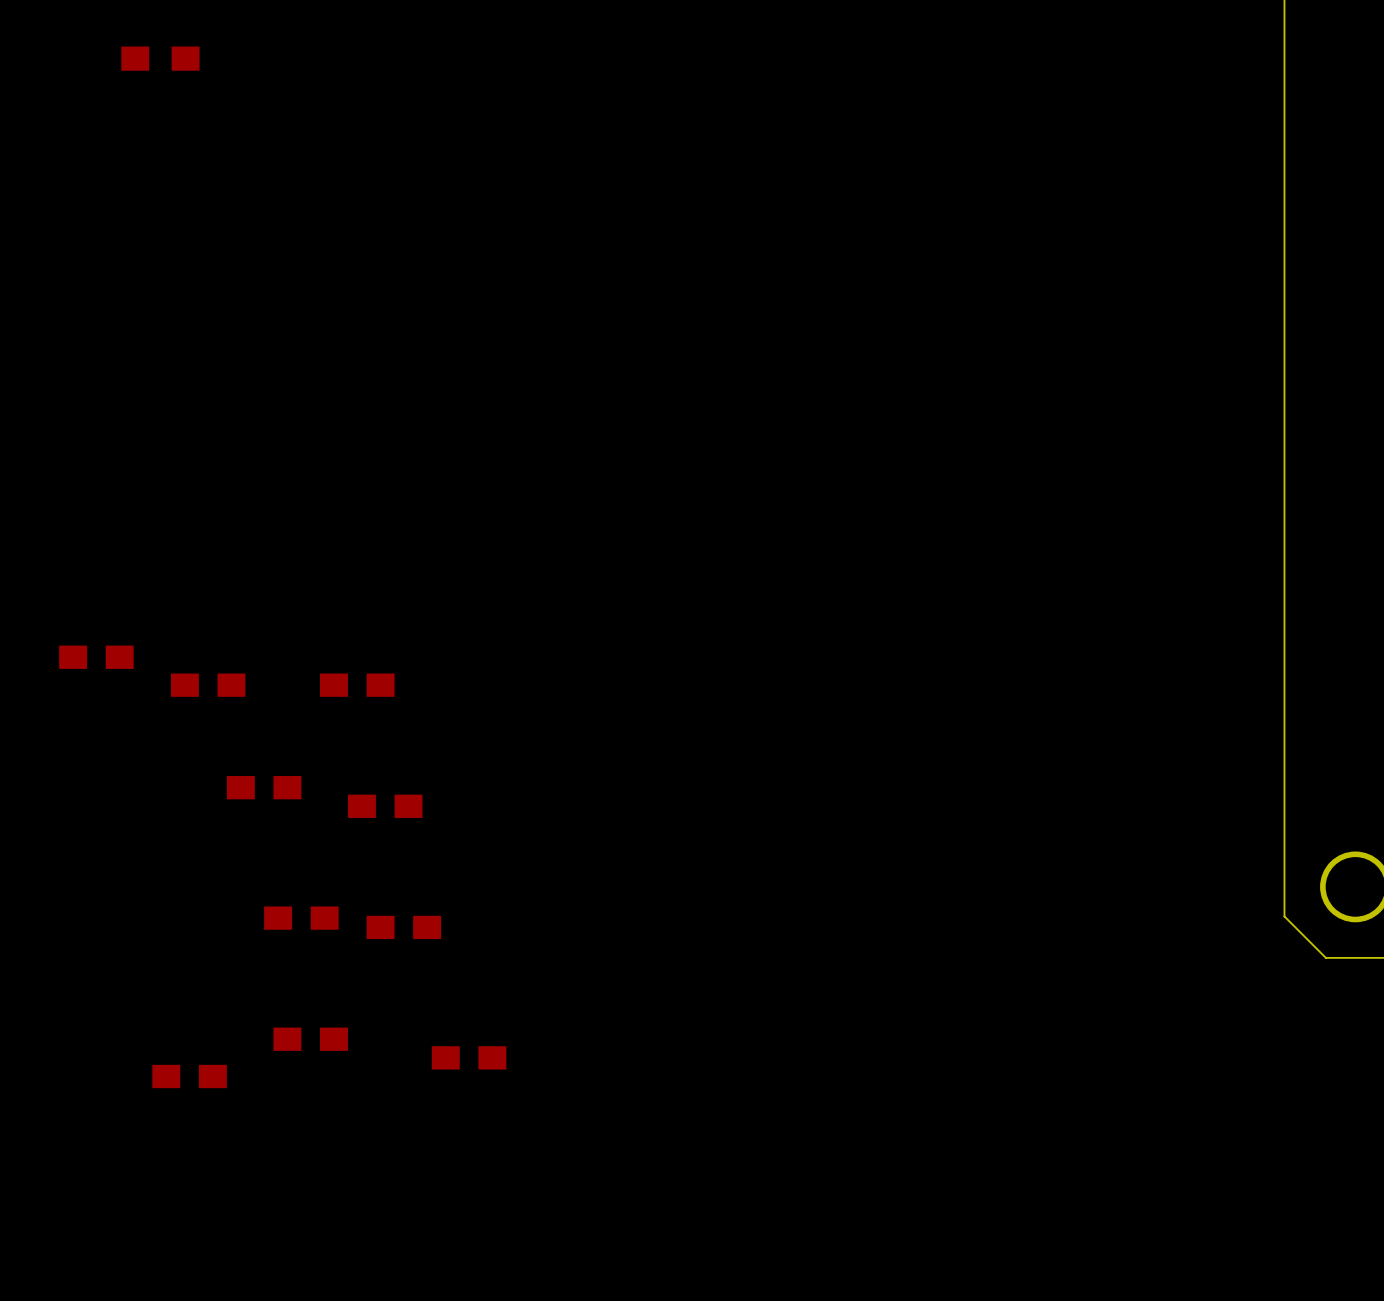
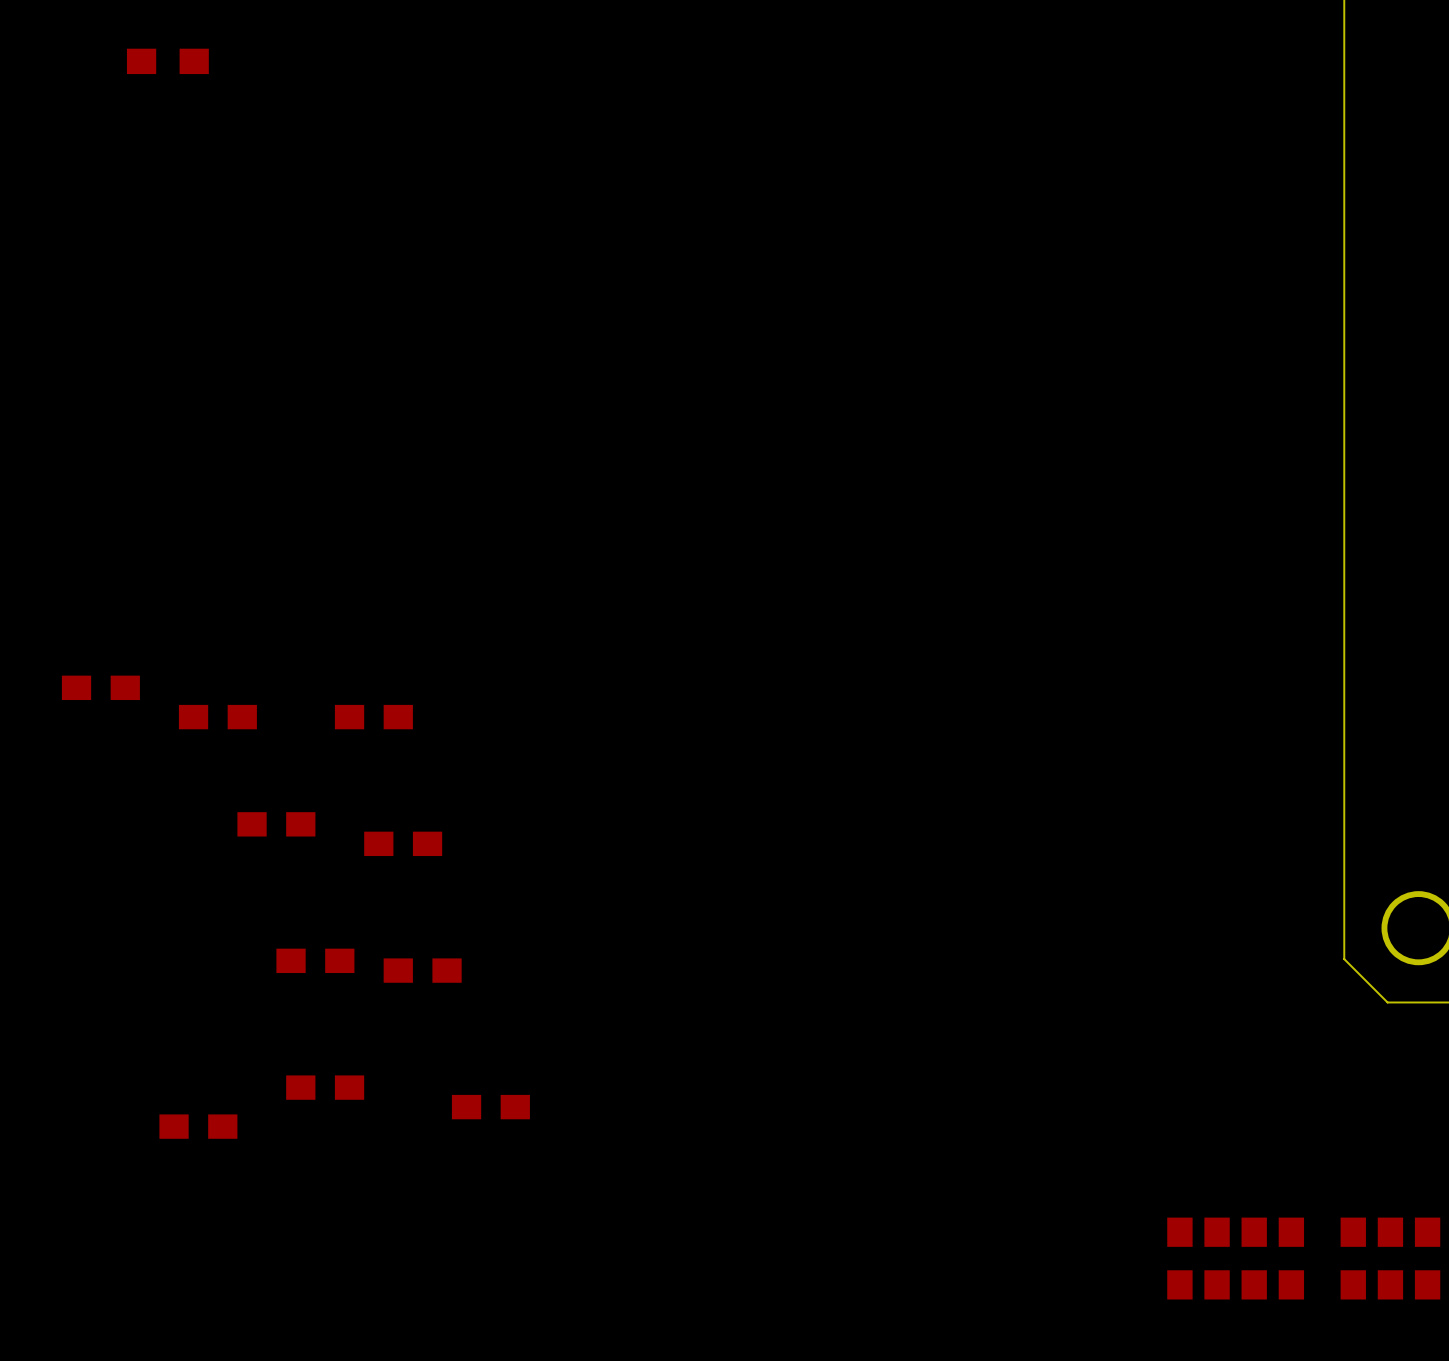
part: none -> (1179, 1258)
part: none -> (1217, 1258)
part: none -> (1254, 1258)
part: none -> (1291, 1258)
part: none -> (1353, 1258)
part: none -> (1390, 1258)
part: none -> (1427, 1258)

